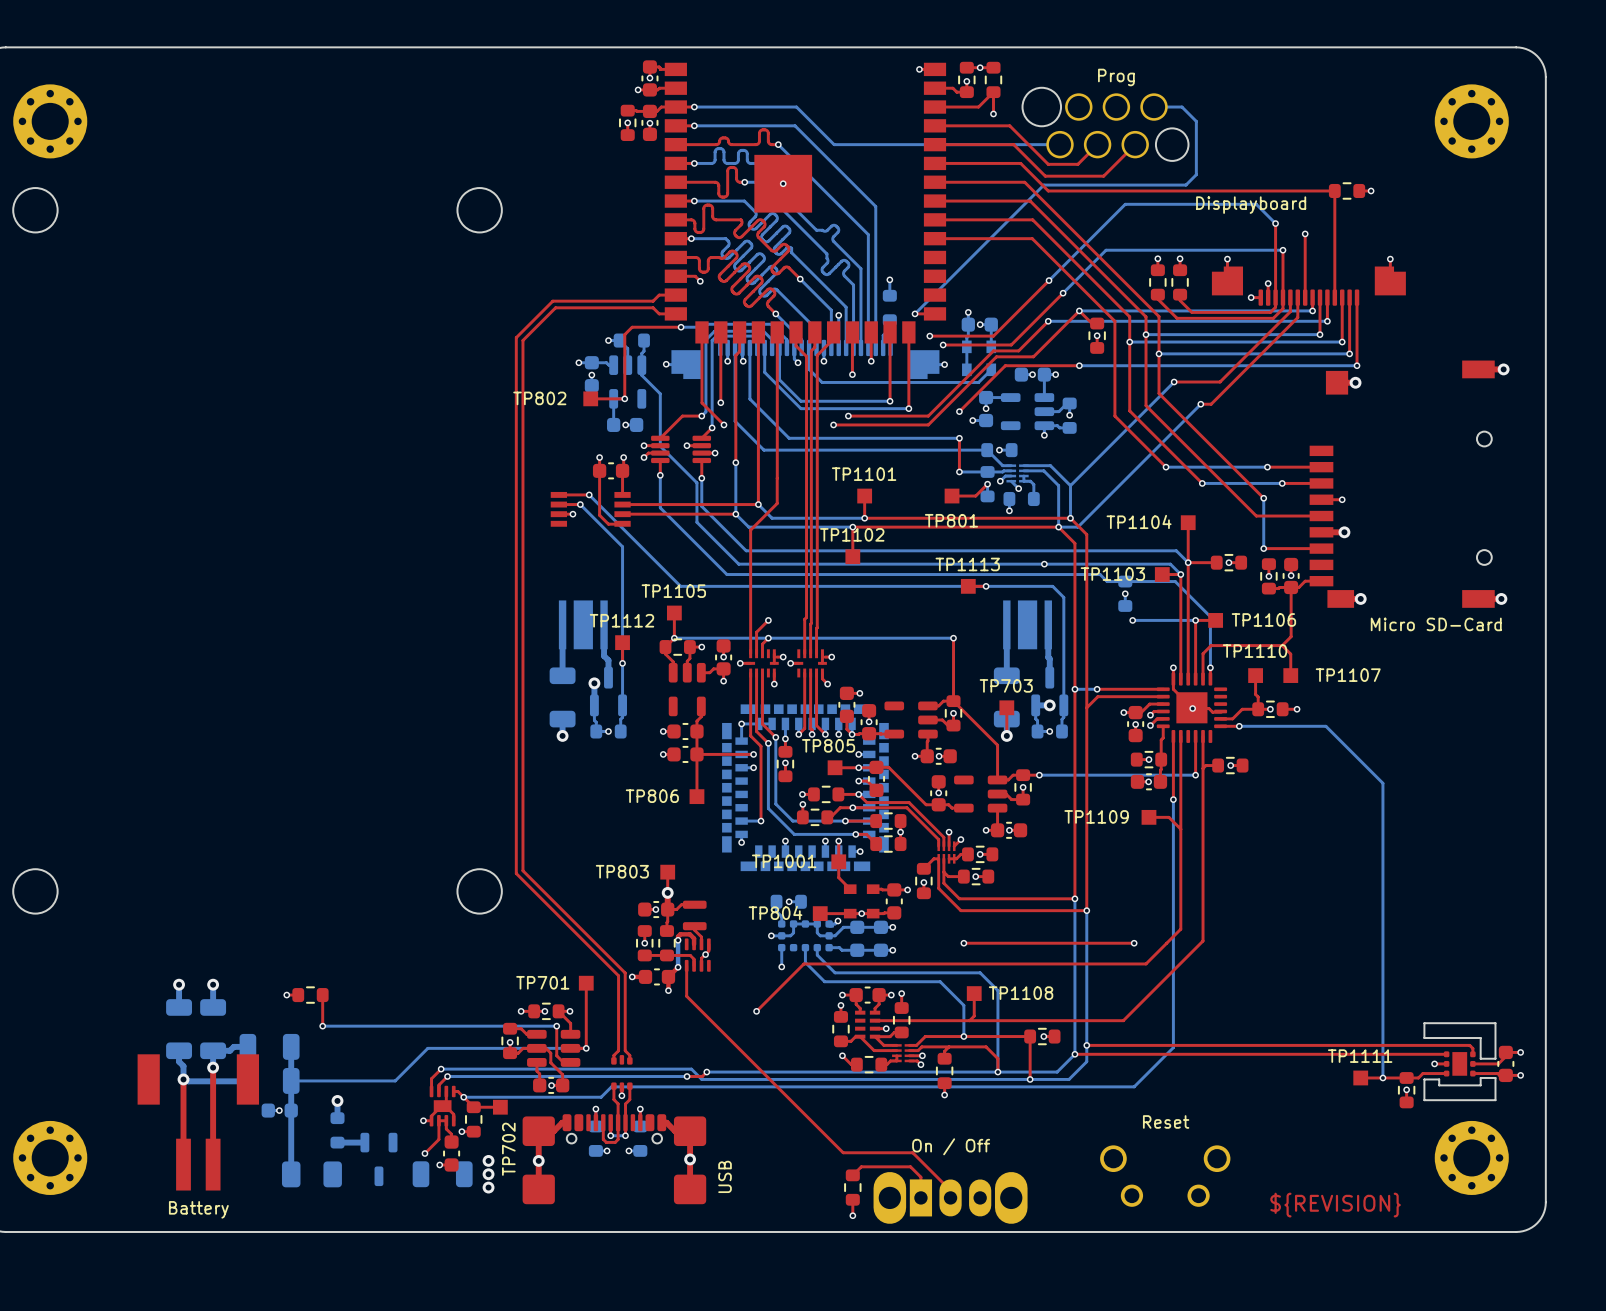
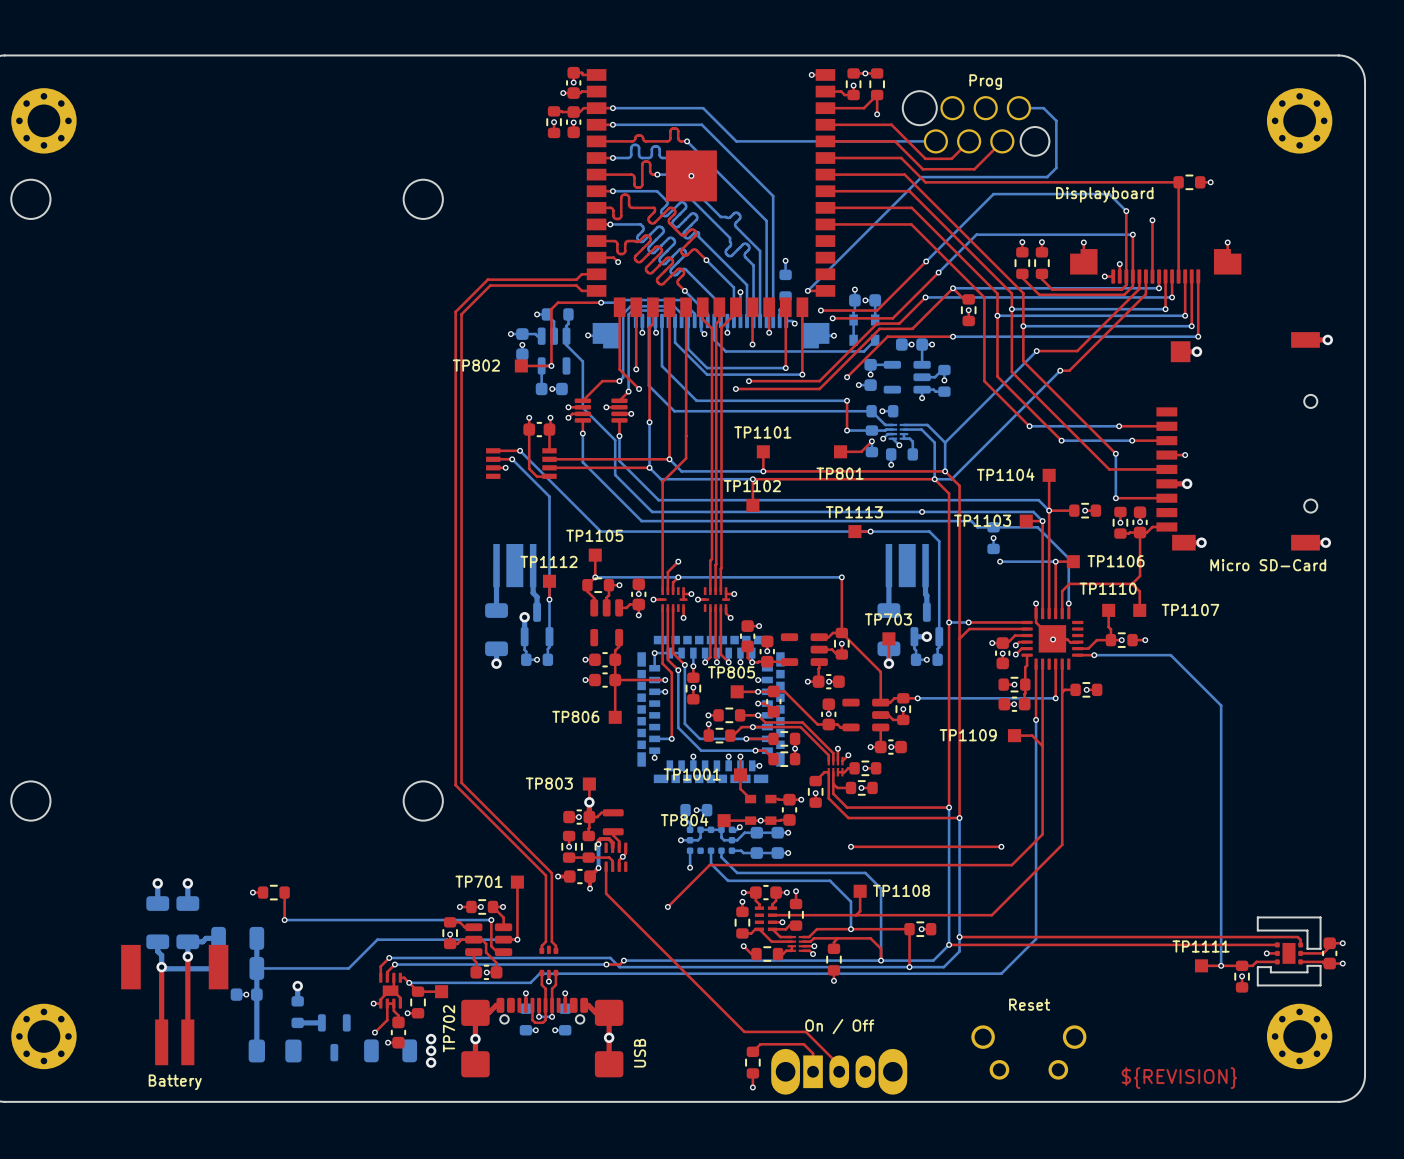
bottom track: none -> (786, 320) (792, 320) (794, 323)
via: none -> (794, 323)

